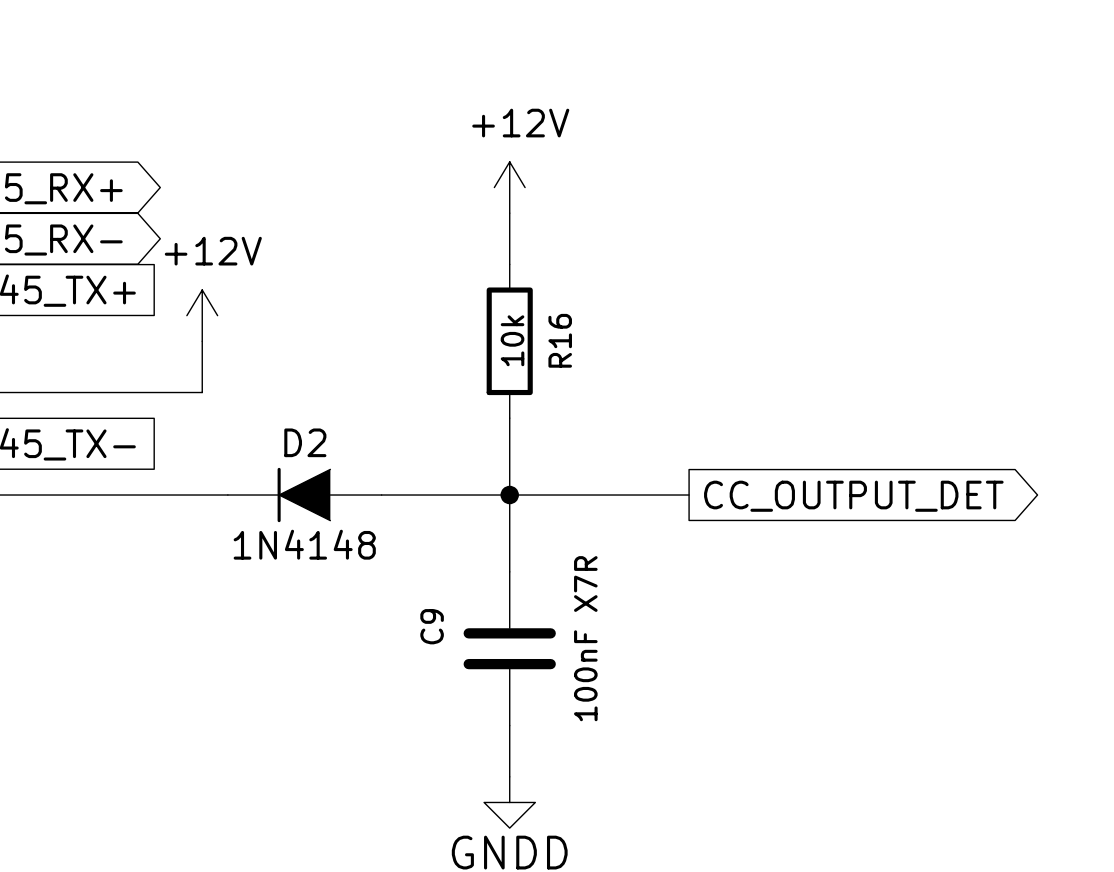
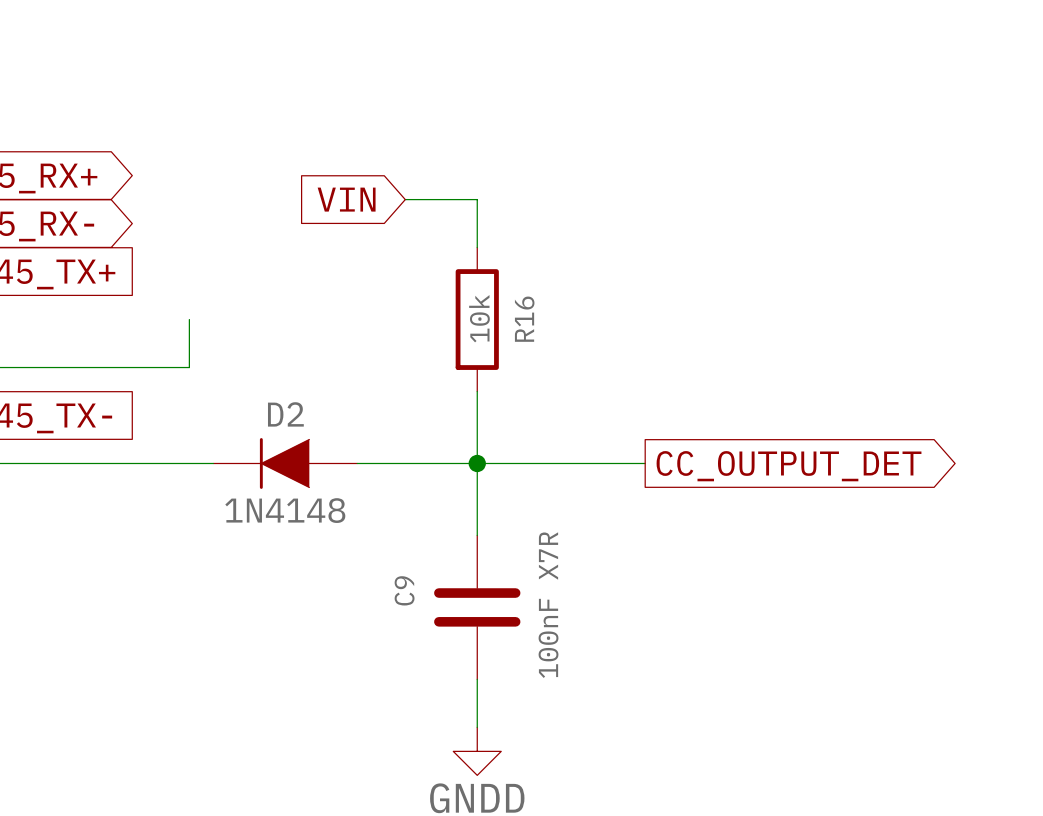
power symbol: +12V (509, 187) -> none
global label: none -> VIN (346, 199)
wire: none -> (405, 199) (477, 199)
power symbol: +12V (202, 315) -> none

